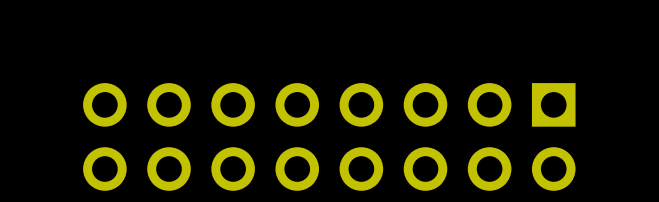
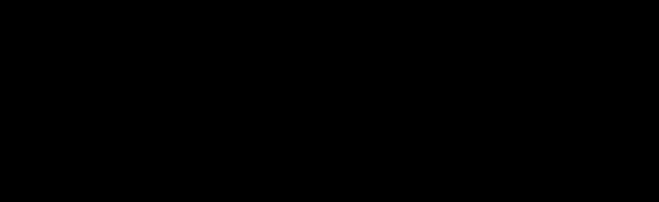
part: (329, 136) -> none

